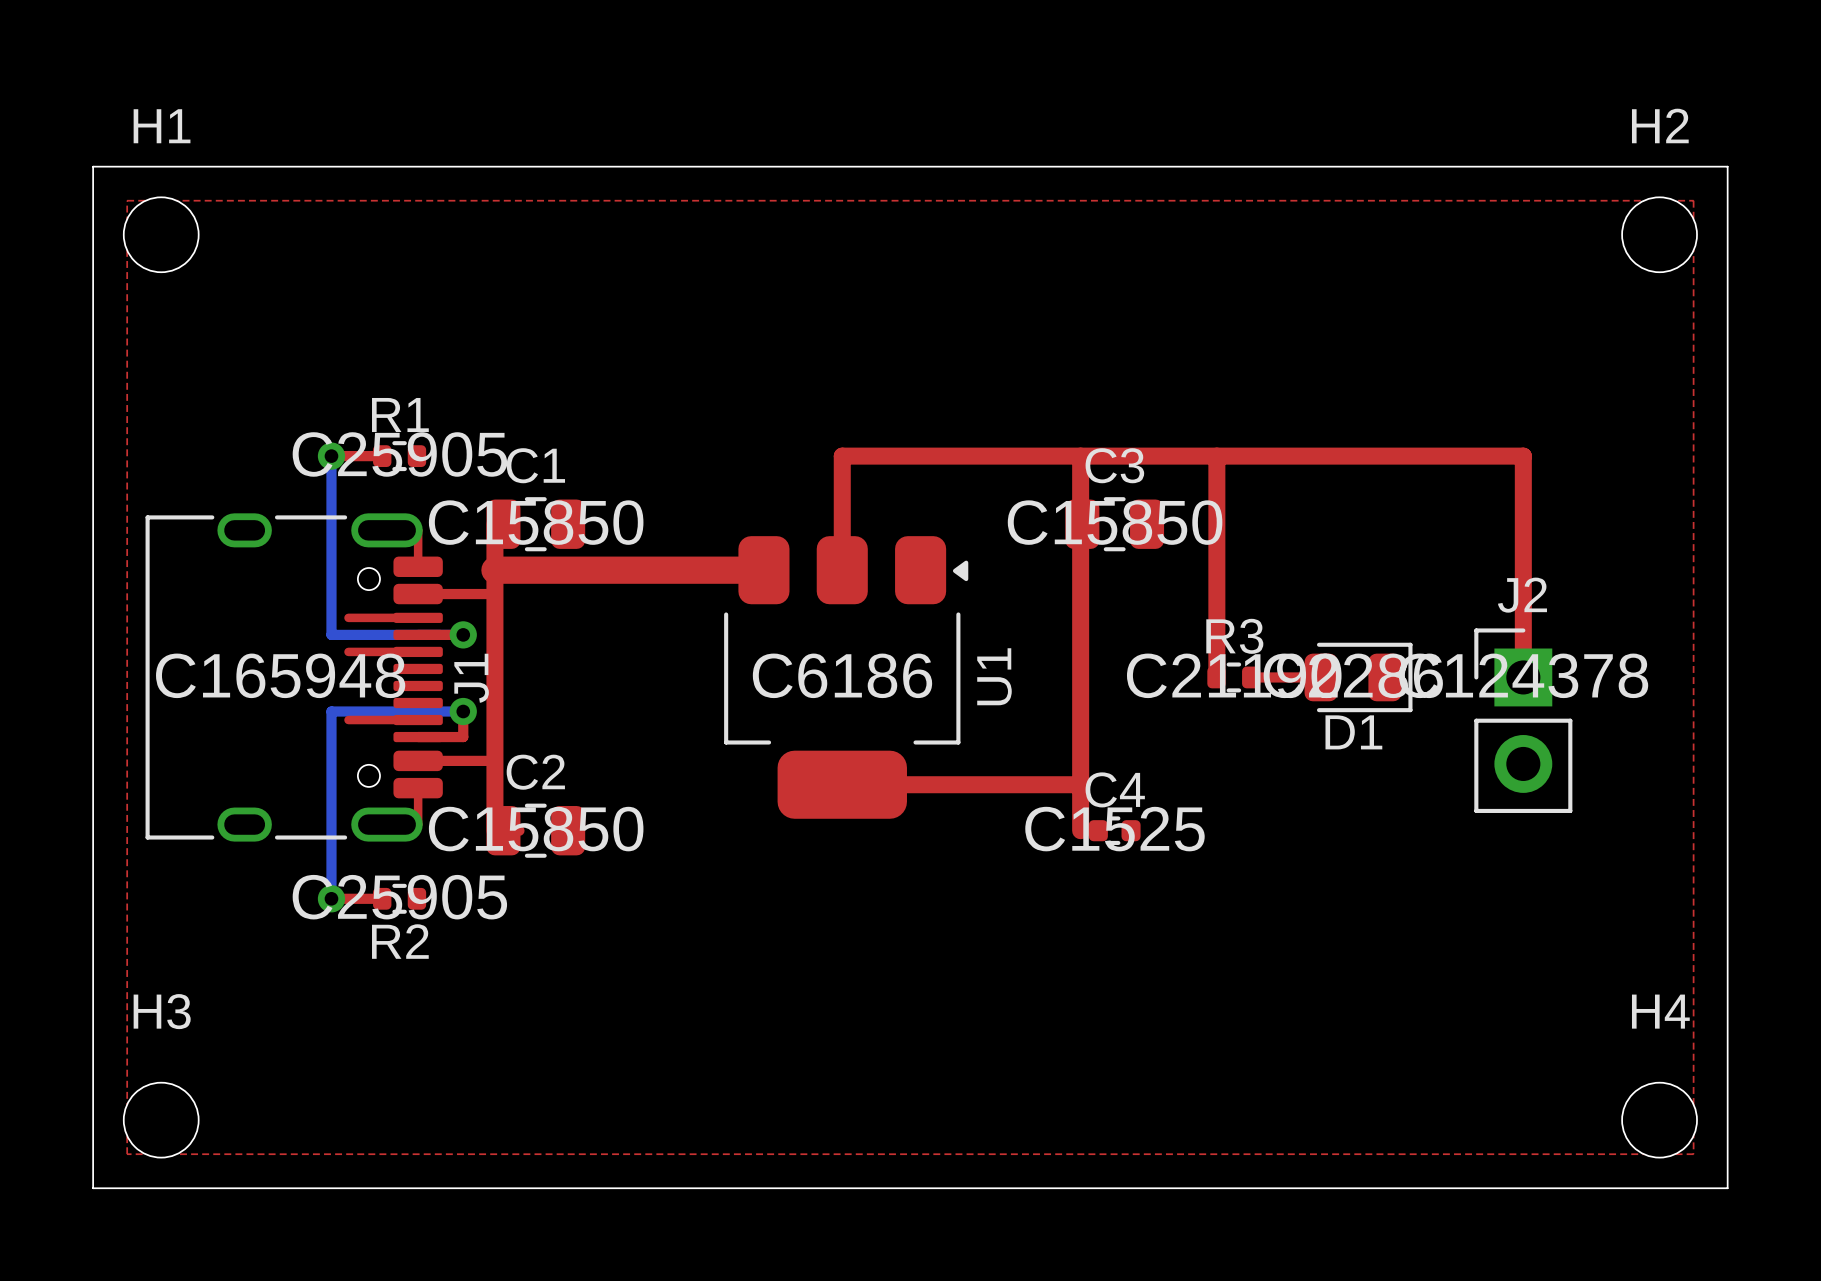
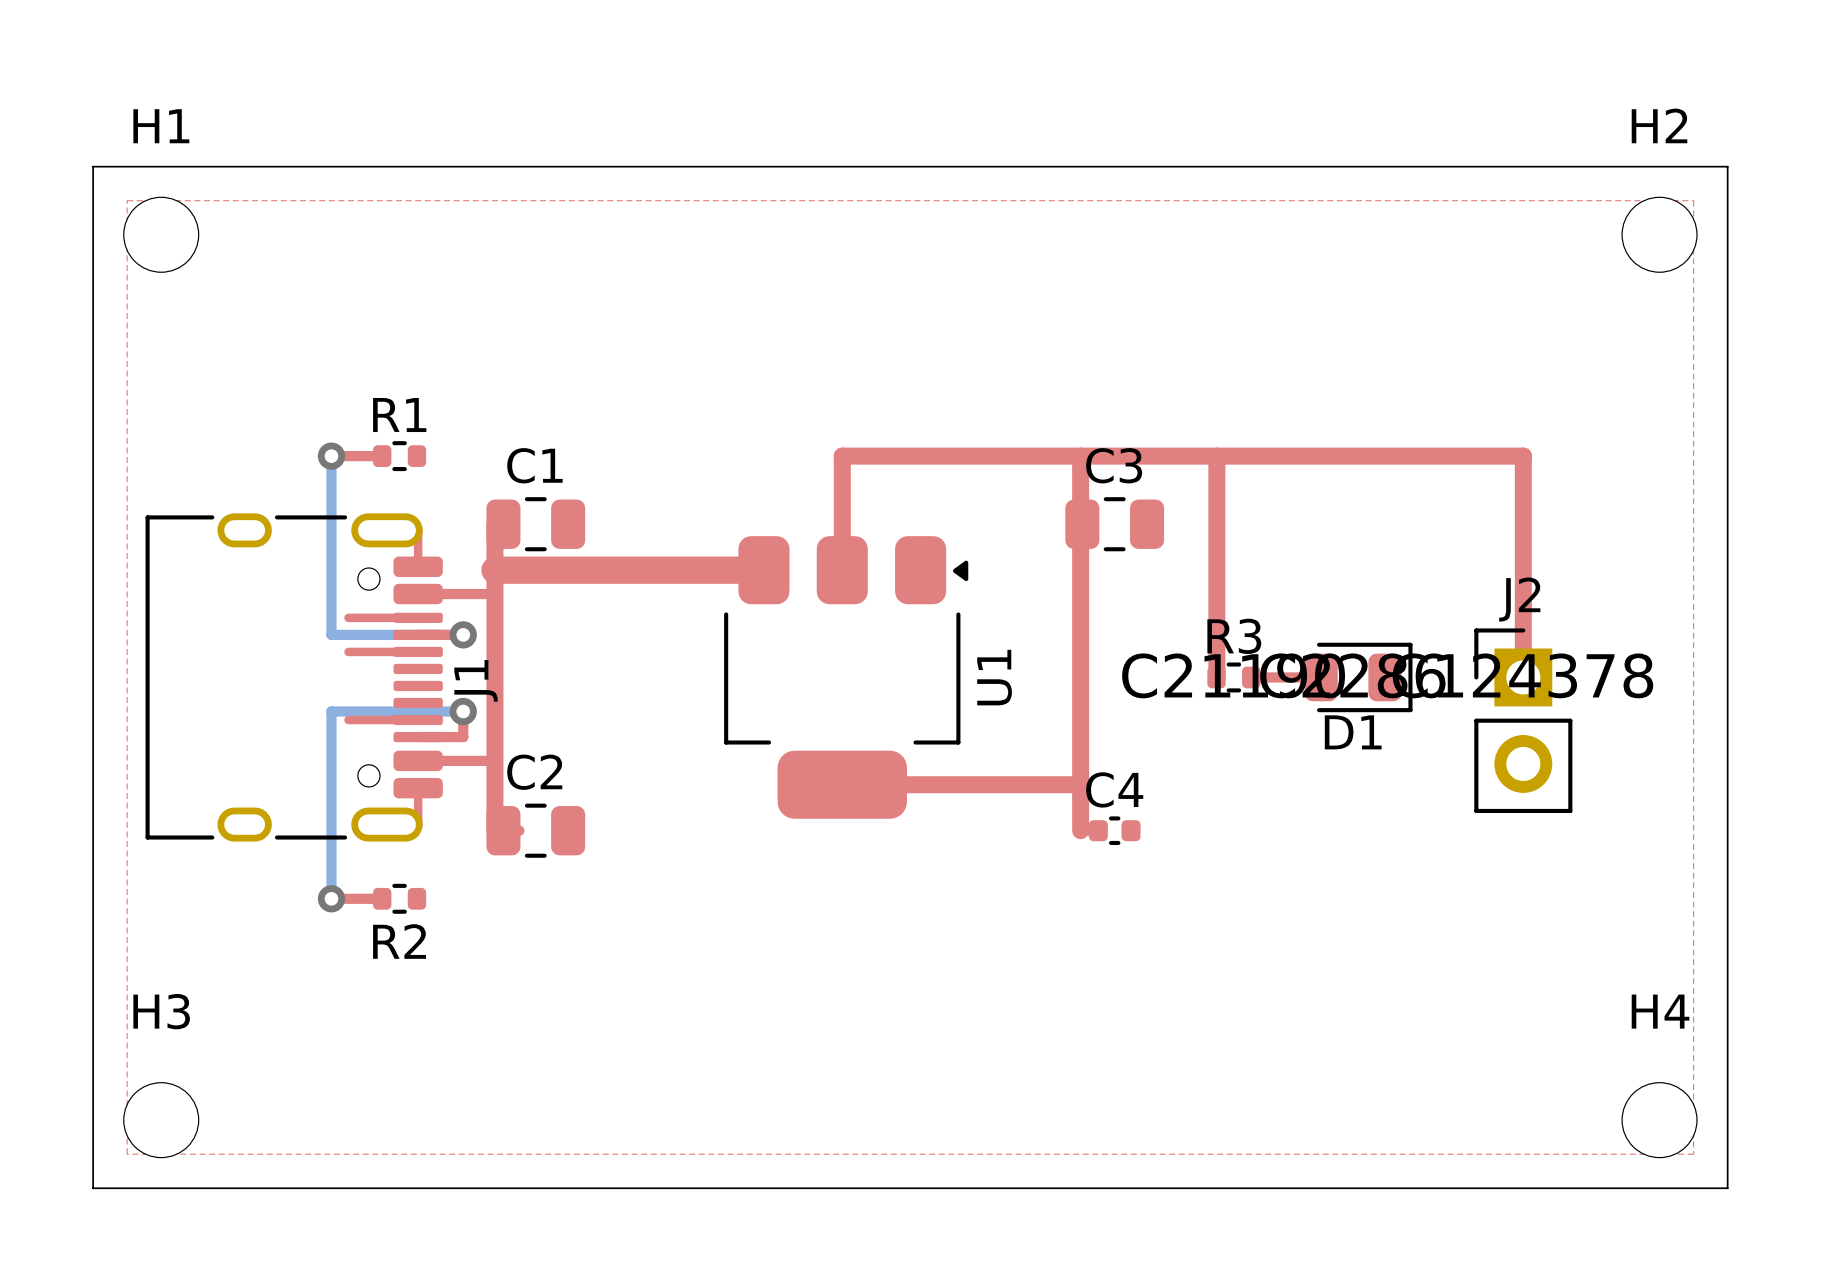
R1 text: C25905 (399, 454) -> none
C1 text: C15850 (536, 522) -> none
C3 text: C15850 (1115, 522) -> none
J1 text: C165948 (280, 675) -> none
U1 text: C6186 (842, 675) -> none
C2 text: C15850 (536, 829) -> none
C4 text: C1525 (1114, 829) -> none
R2 text: C25905 (399, 897) -> none

